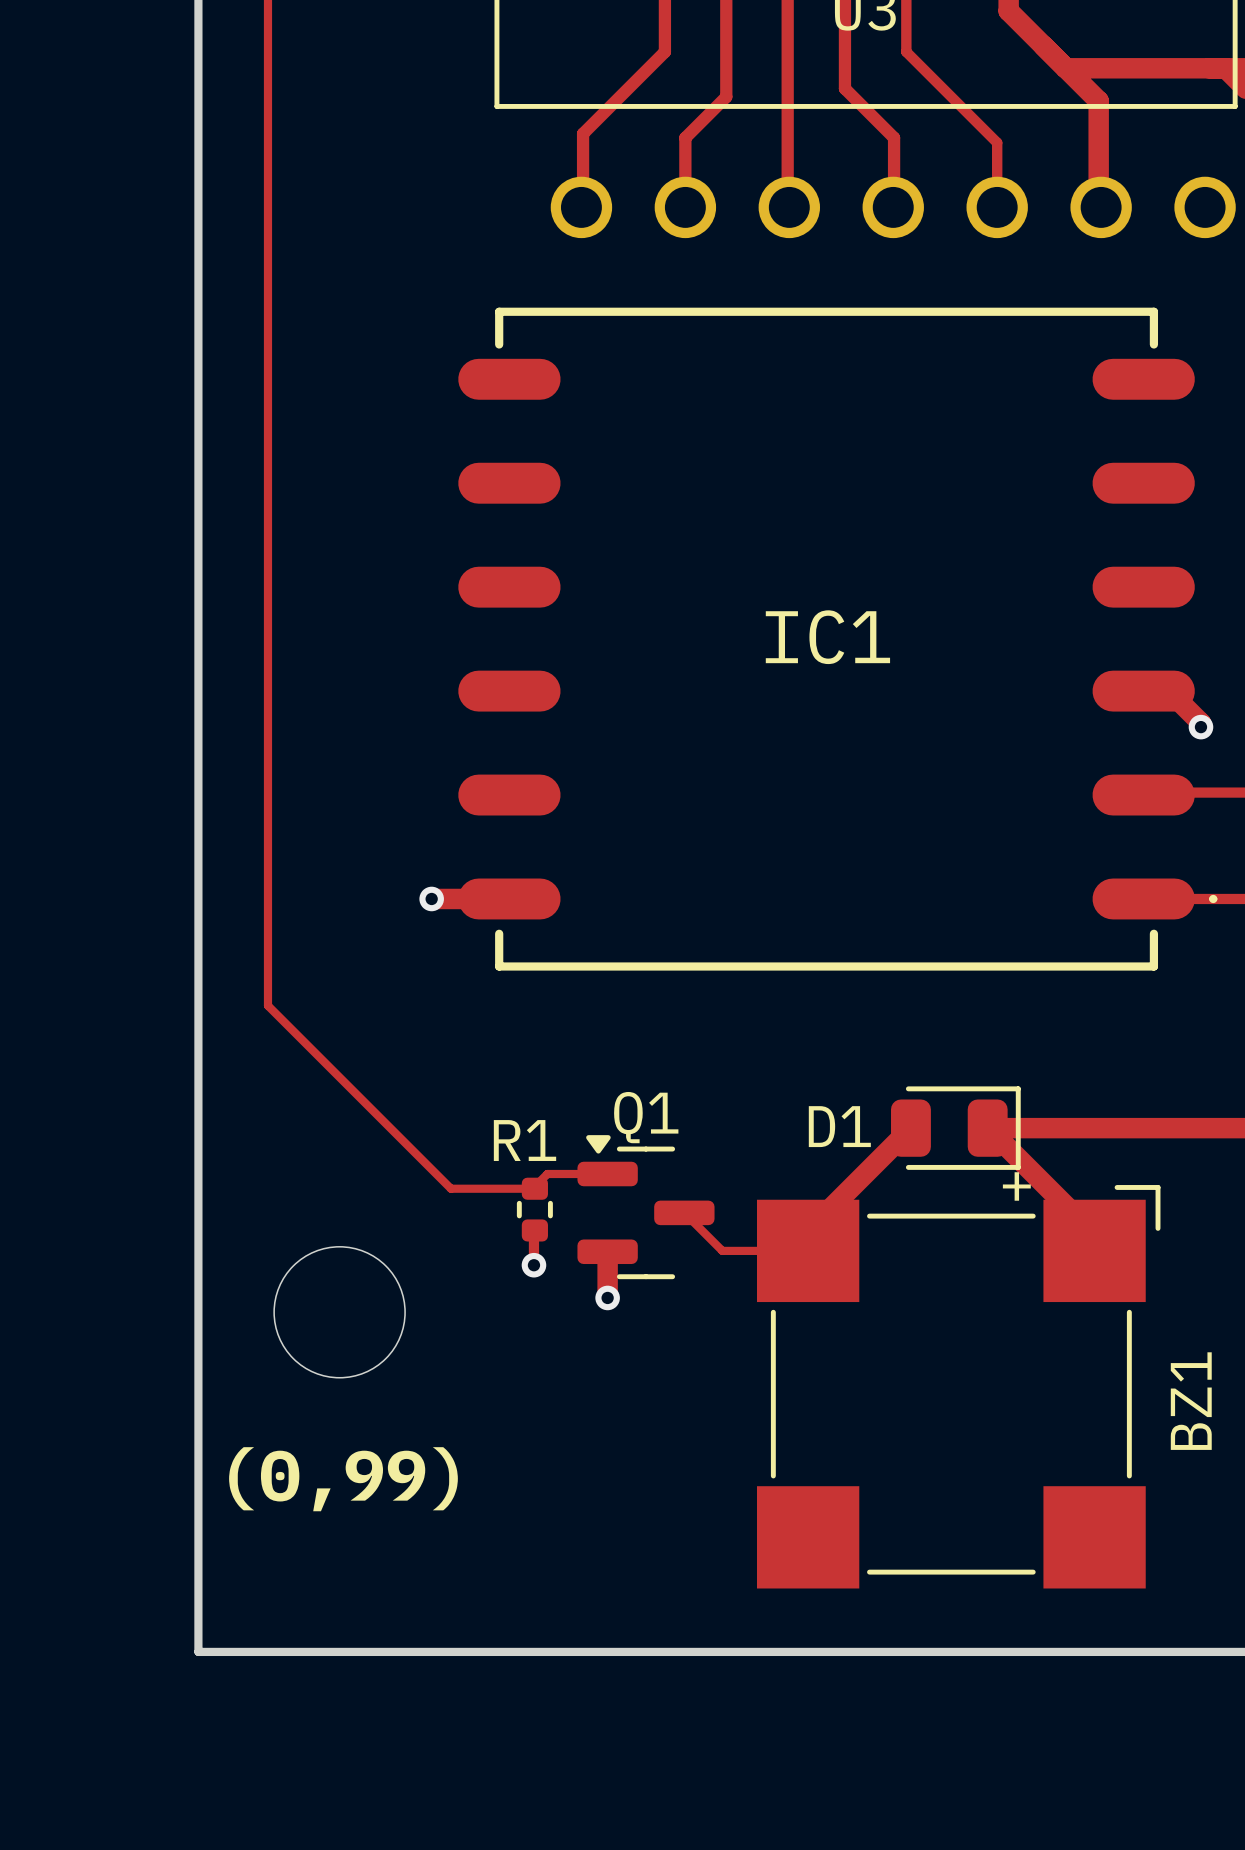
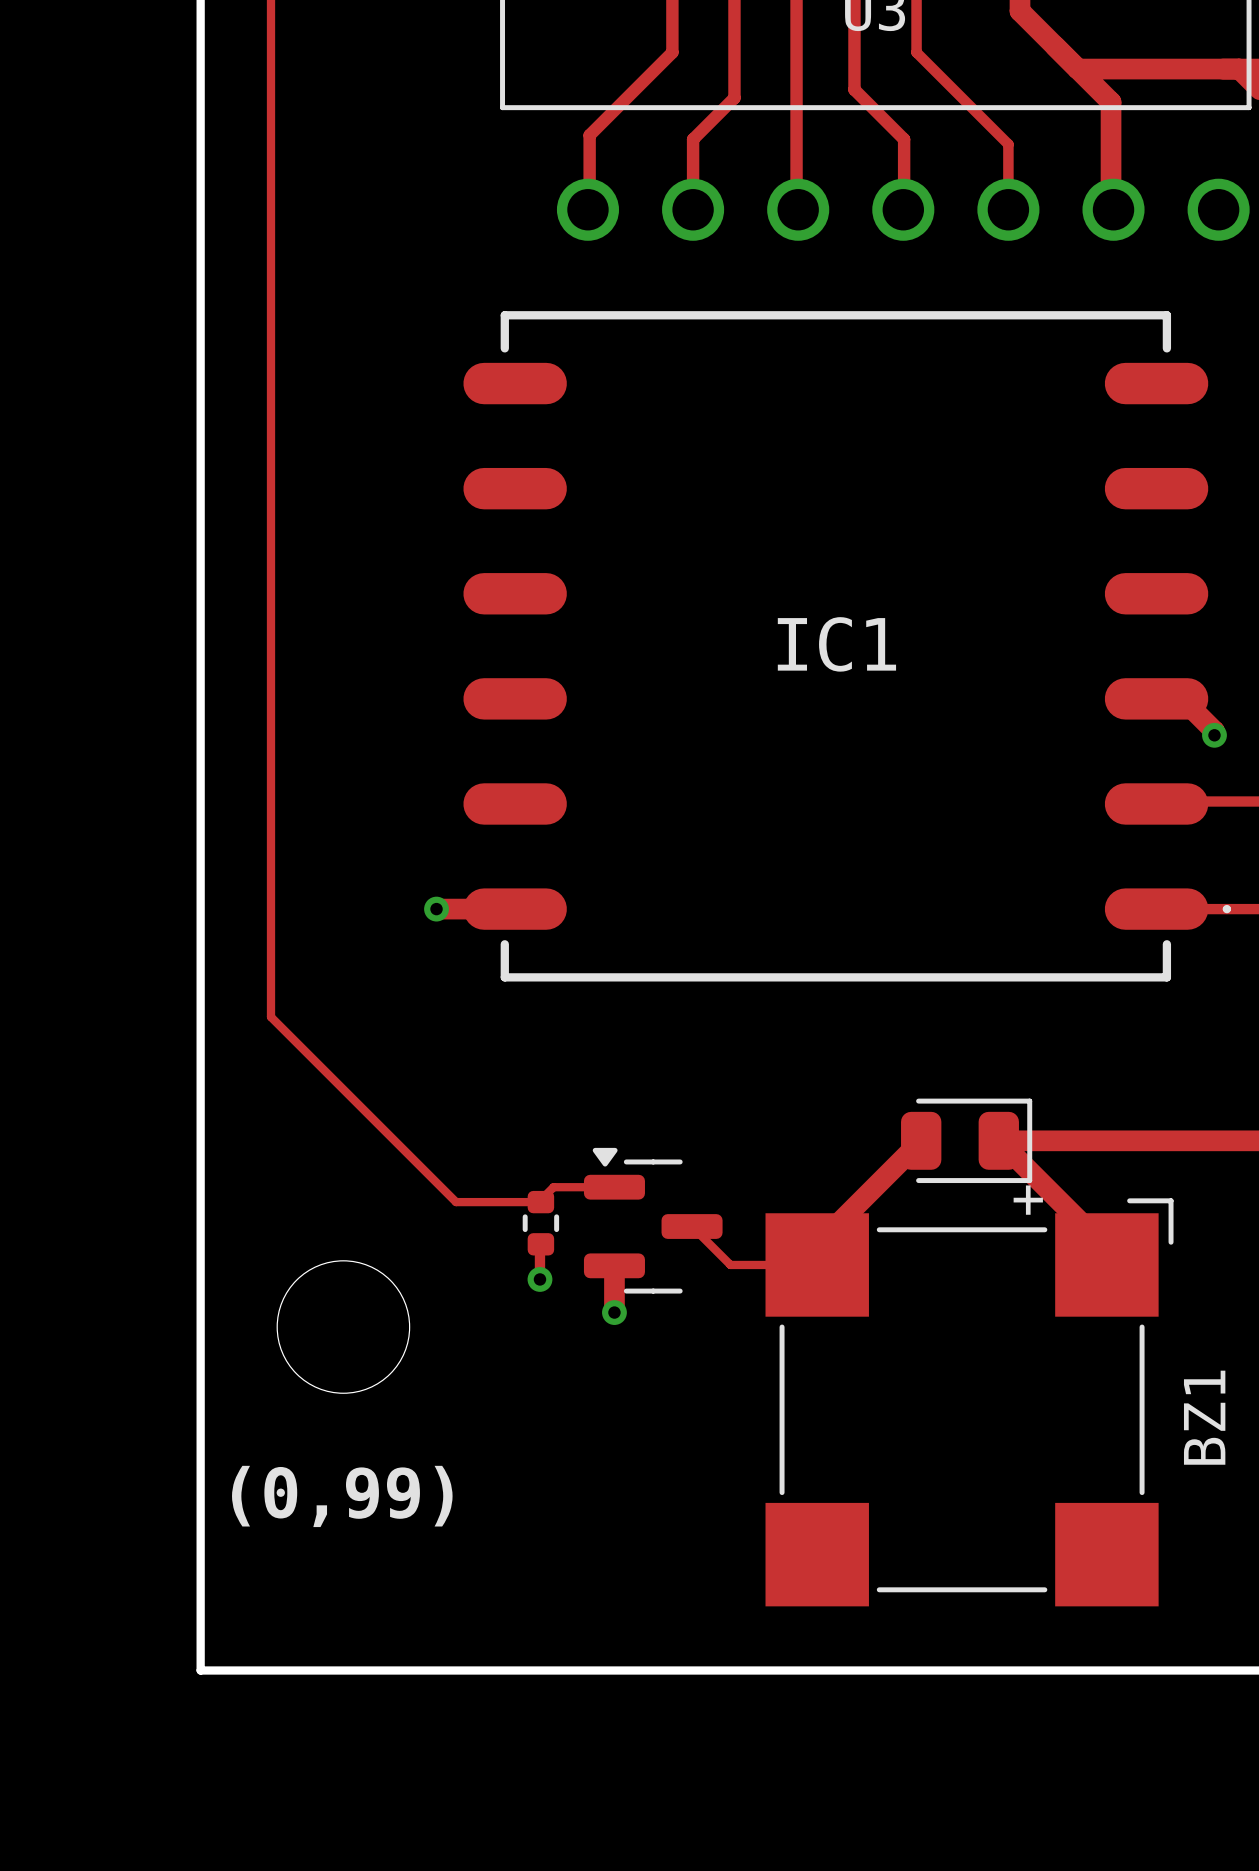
Q1 name: Q1 (646, 1117) -> none
D1 name: D1 (839, 1126) -> none
R1 name: R1 (525, 1140) -> none

